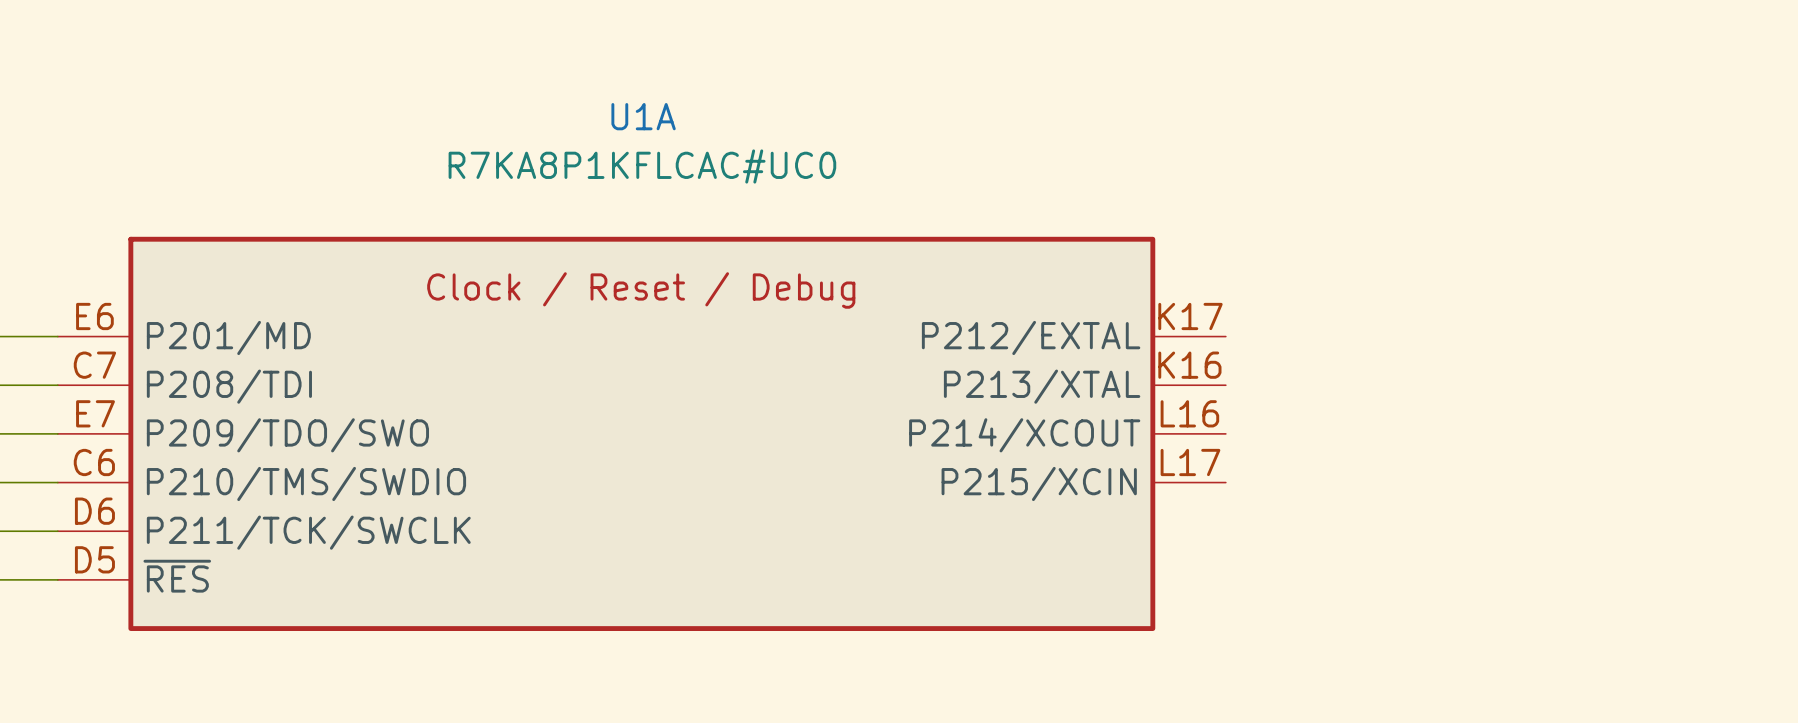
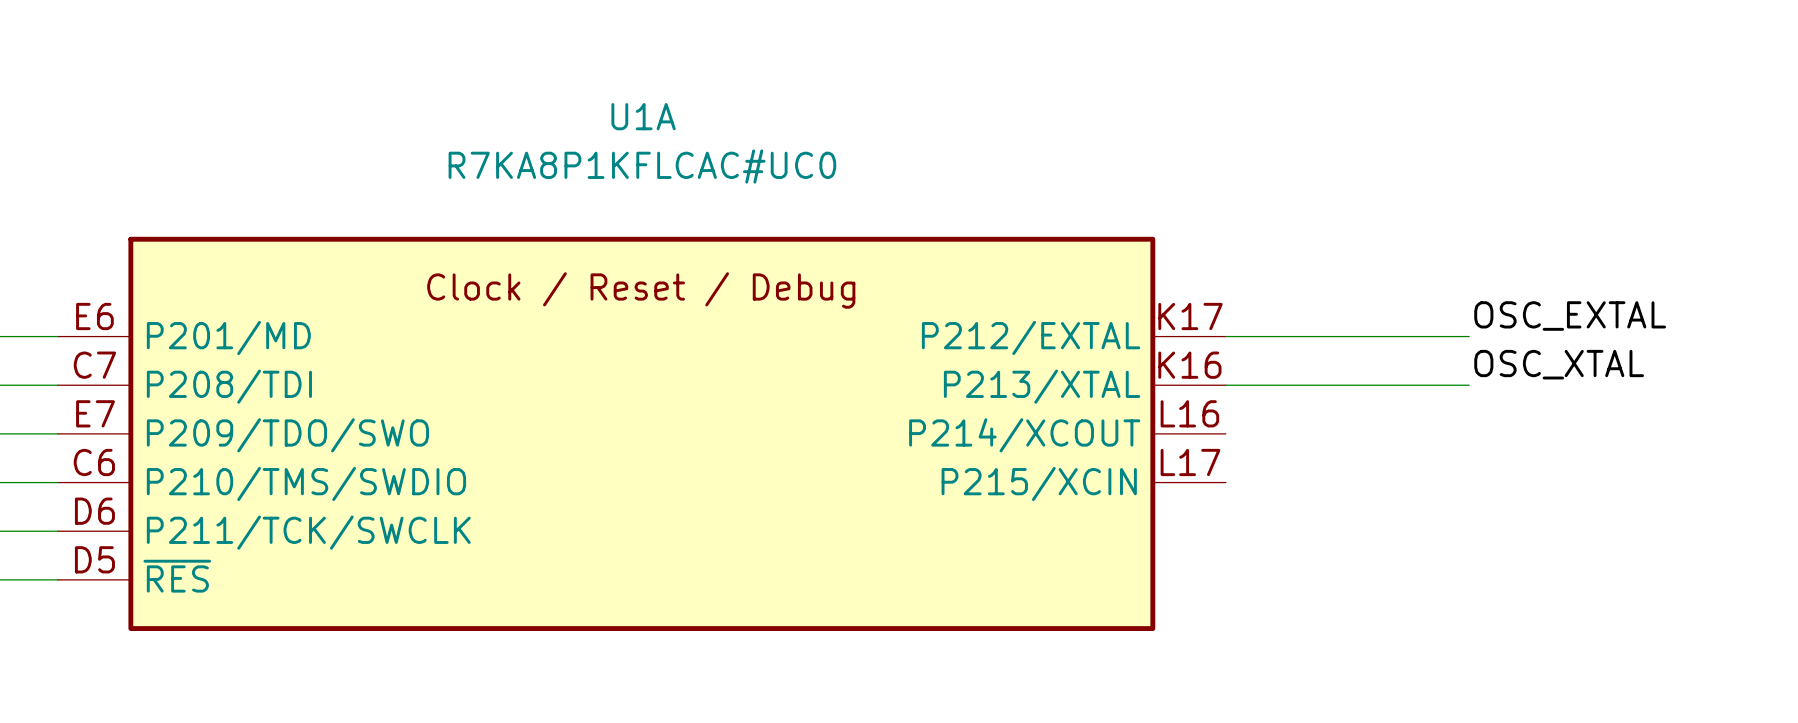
label: none -> OSC_EXTAL (1570, 316)
wire: none -> (1225, 336) (1469, 336)
label: none -> OSC_XTAL (1559, 364)
wire: none -> (1225, 385) (1469, 385)

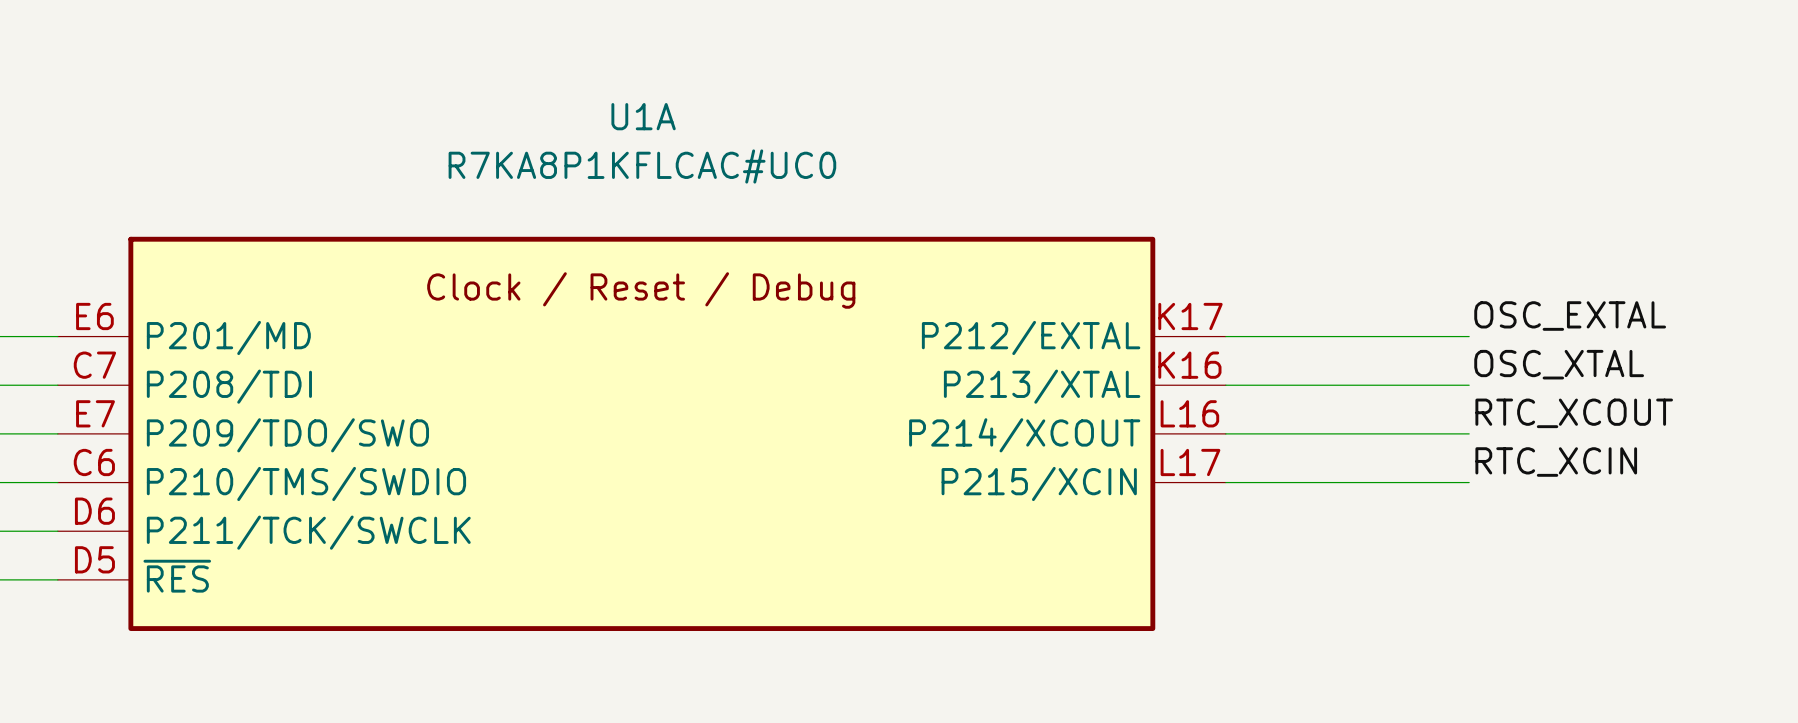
label: none -> RTC_XCOUT (1574, 413)
wire: none -> (1225, 433) (1469, 433)
label: none -> RTC_XCIN (1556, 462)
wire: none -> (1225, 482) (1469, 482)

